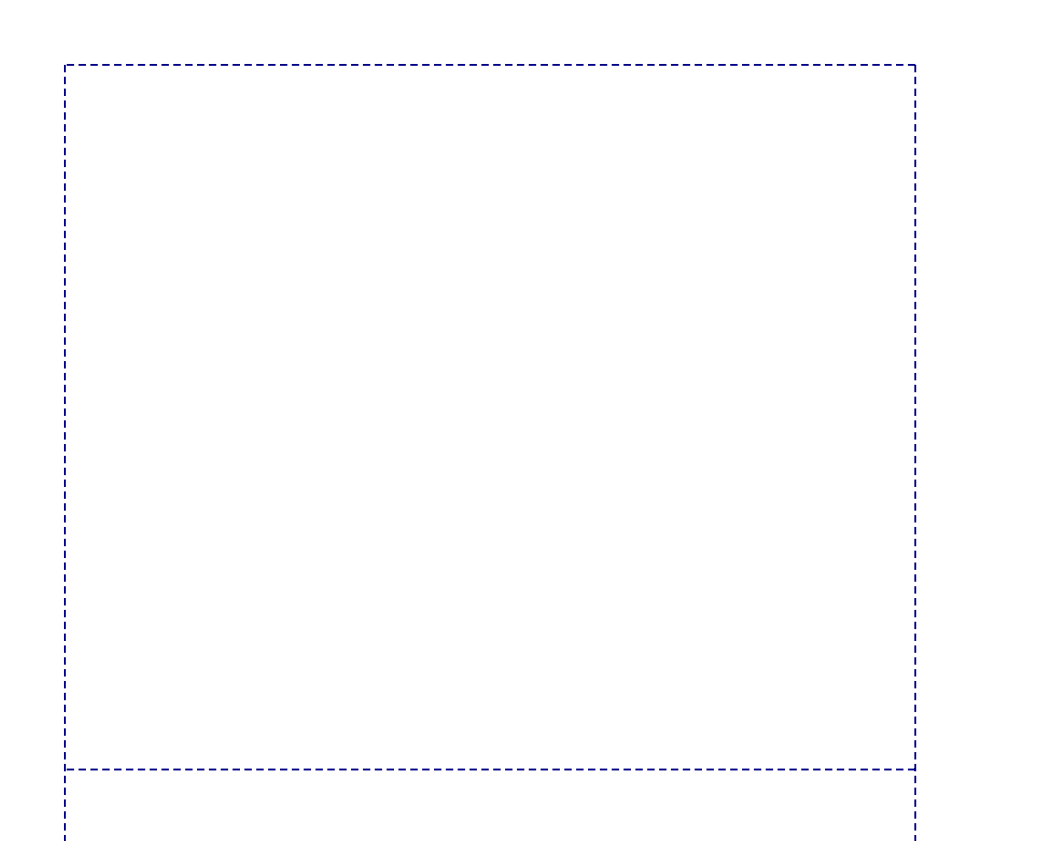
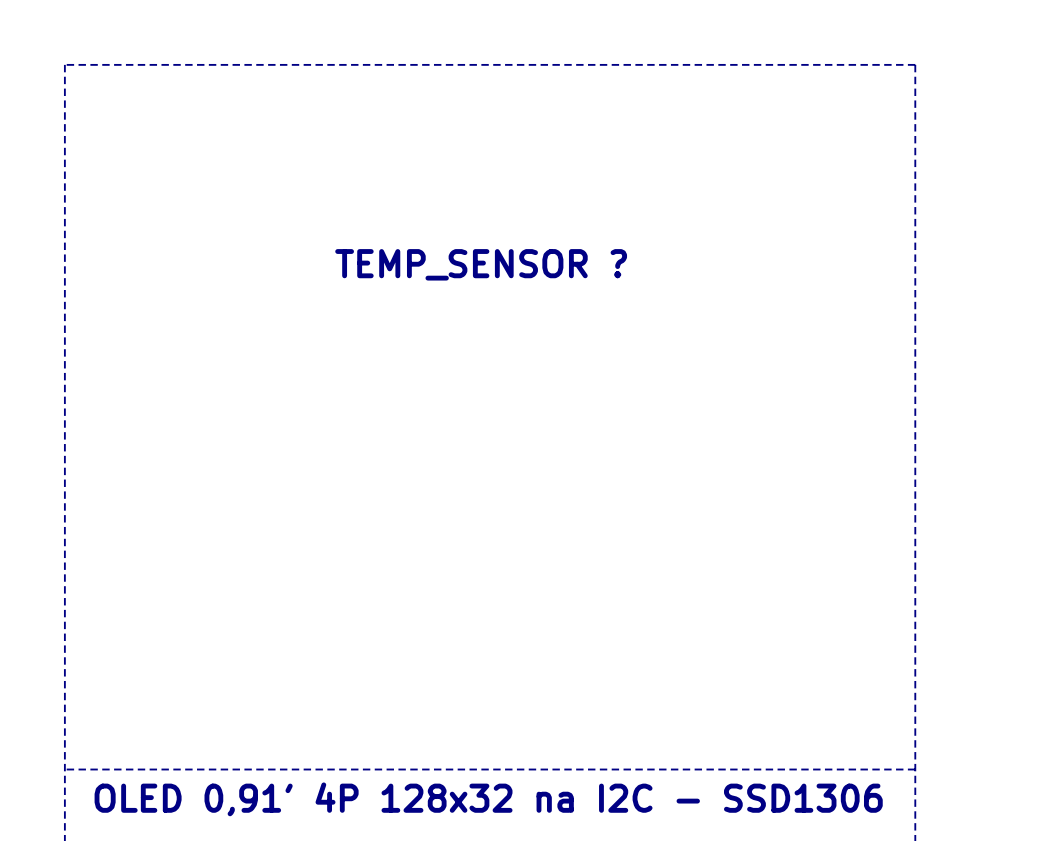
text: none -> TEMP_SENSOR ? (481, 264)
text: none -> OLED 0,91' 4P 128x32 na I2C - SSD1306 (488, 799)

